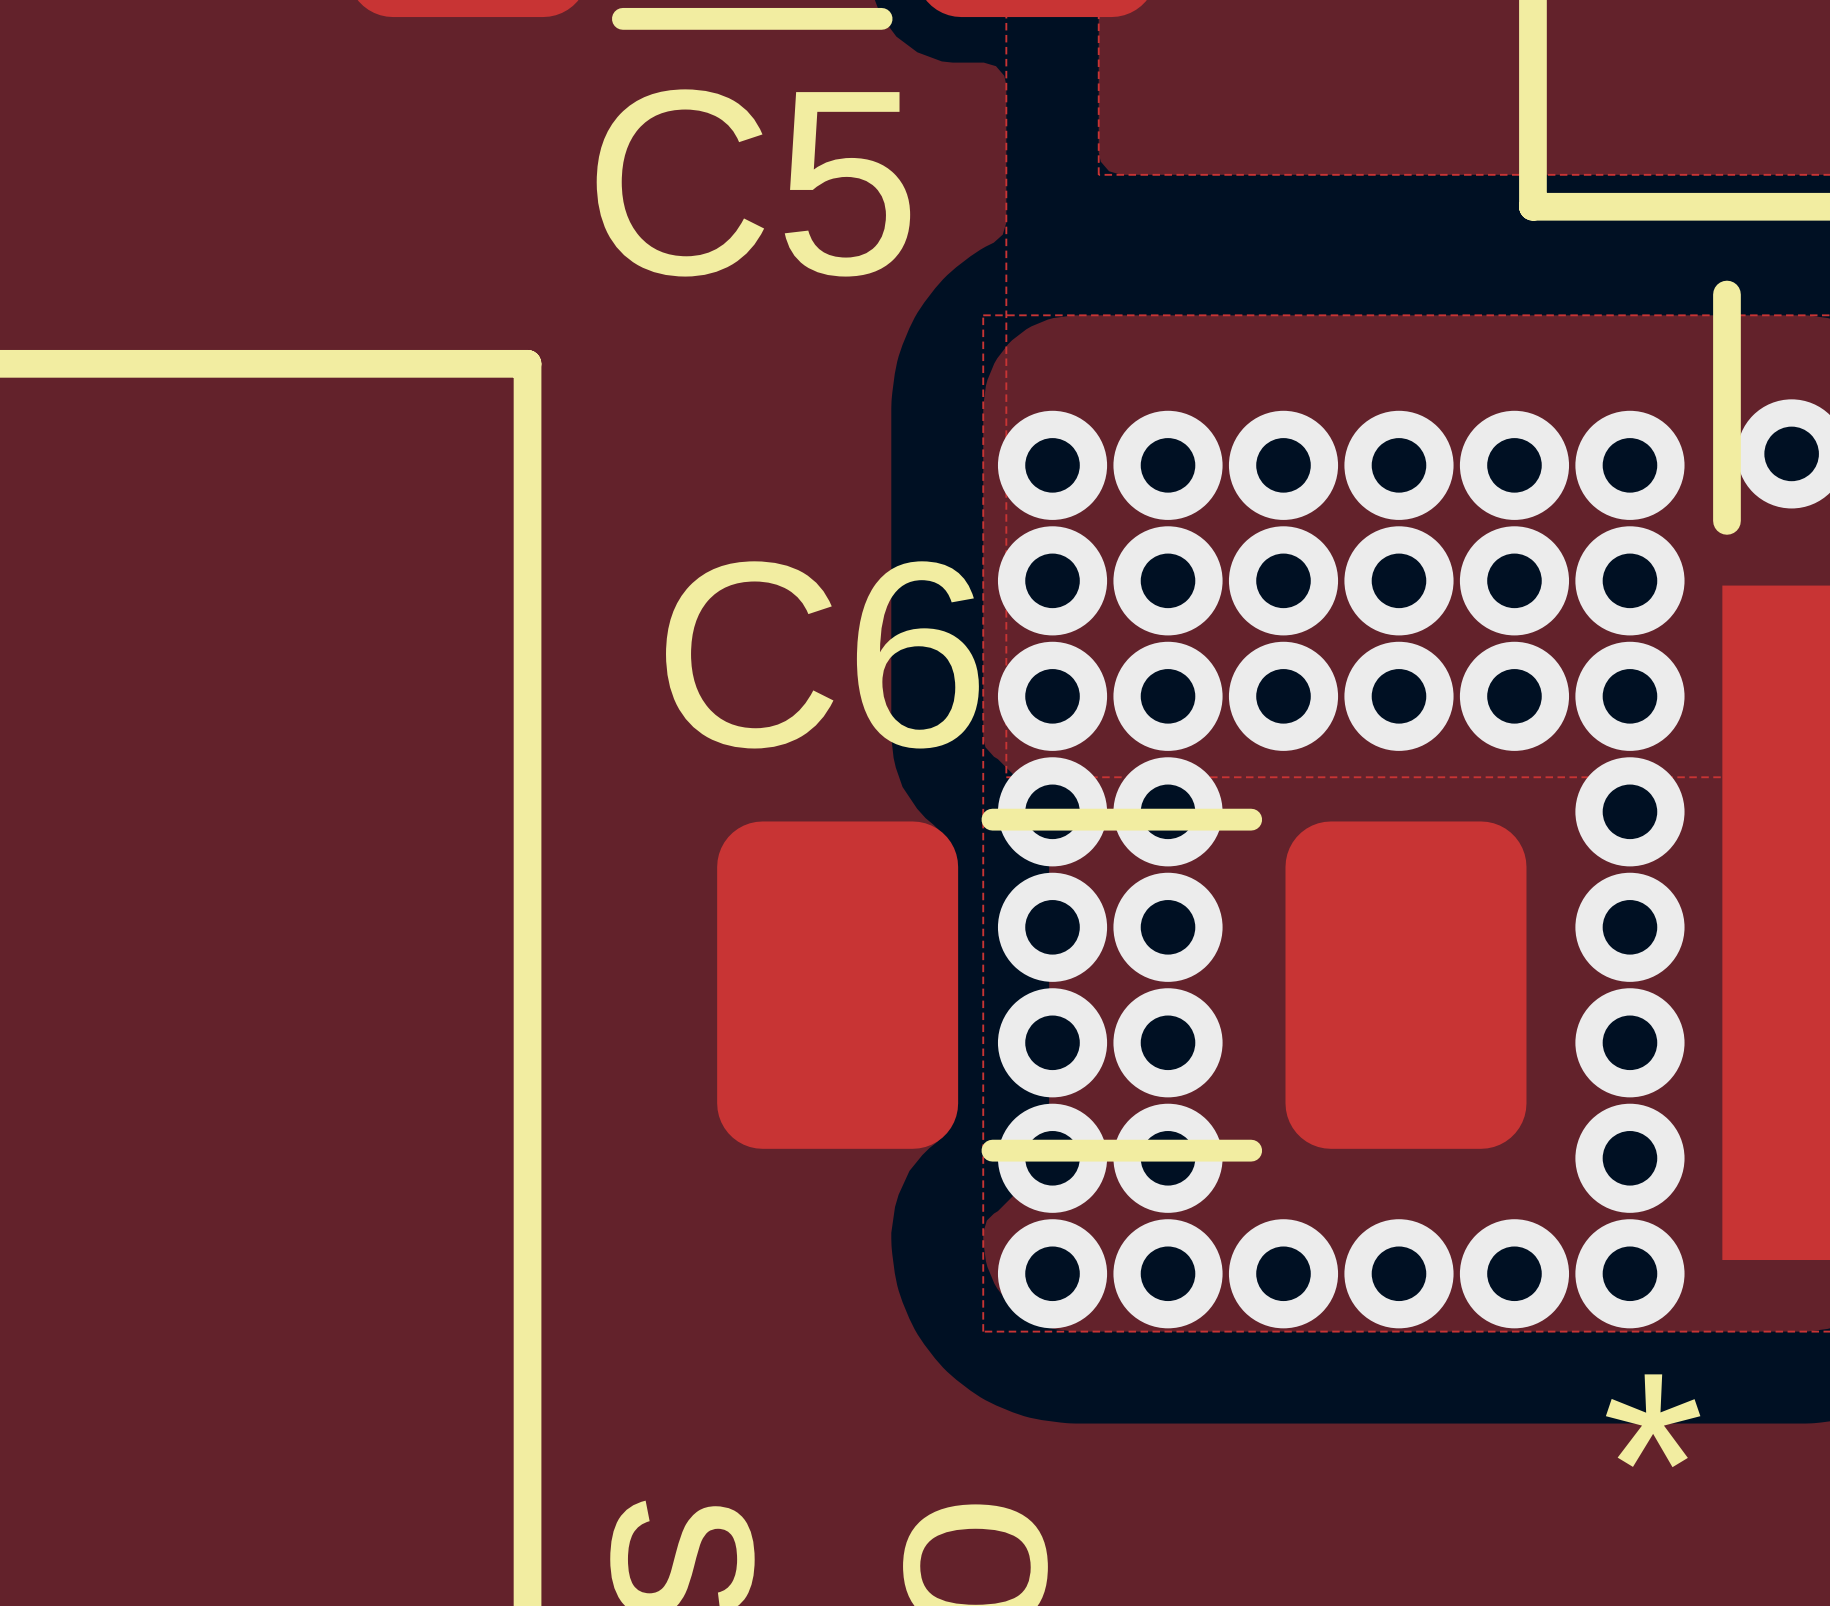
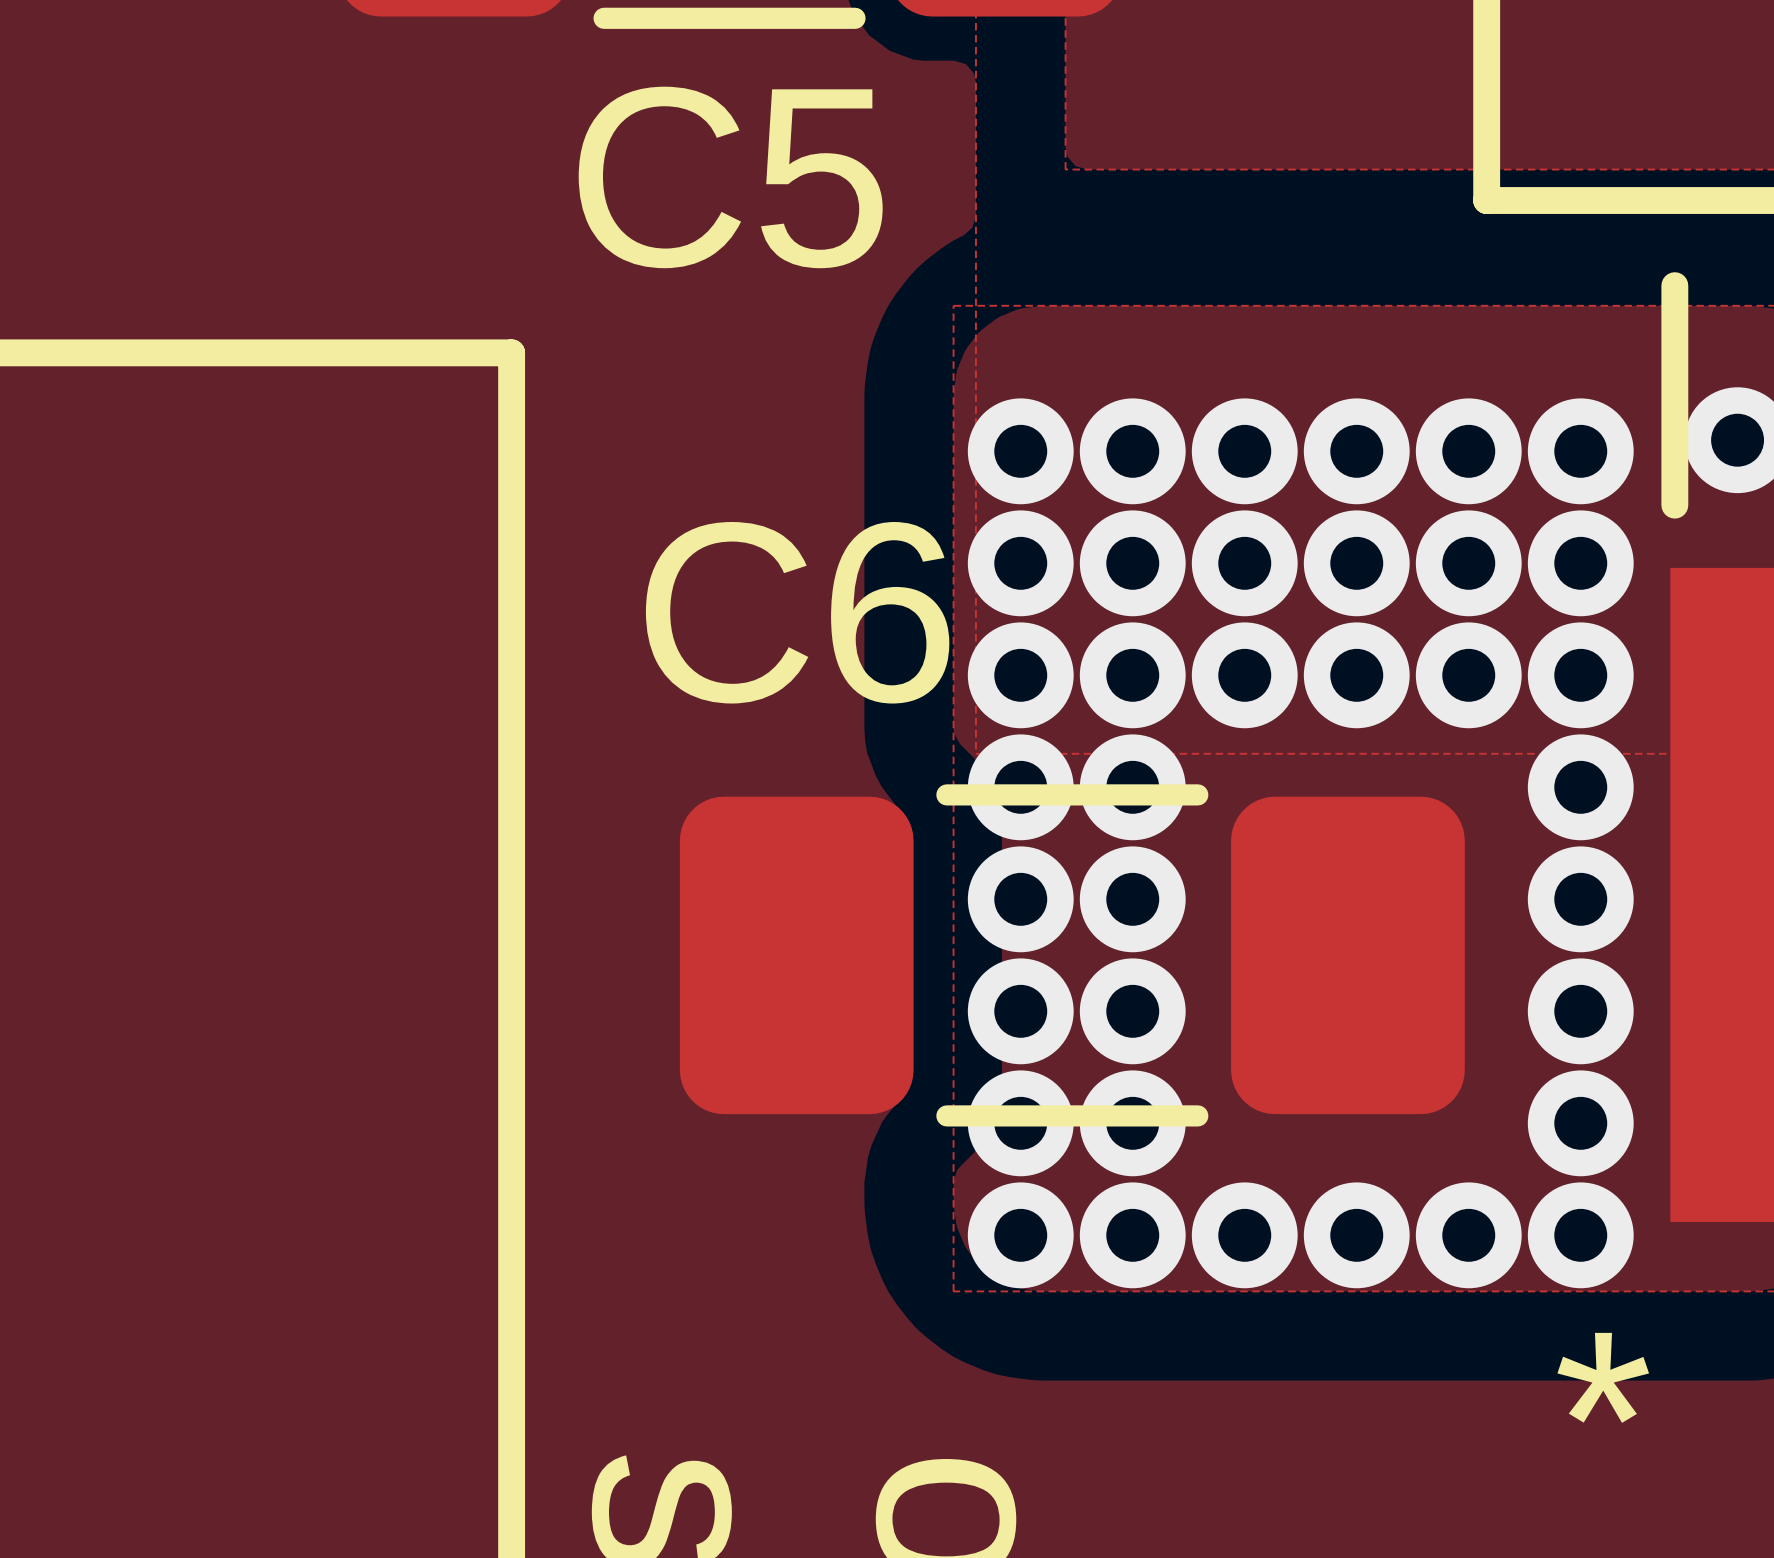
C6 name position: C6 (822, 654) -> C6 (797, 612)
C6 position: (1121, 985) -> (1072, 955)

